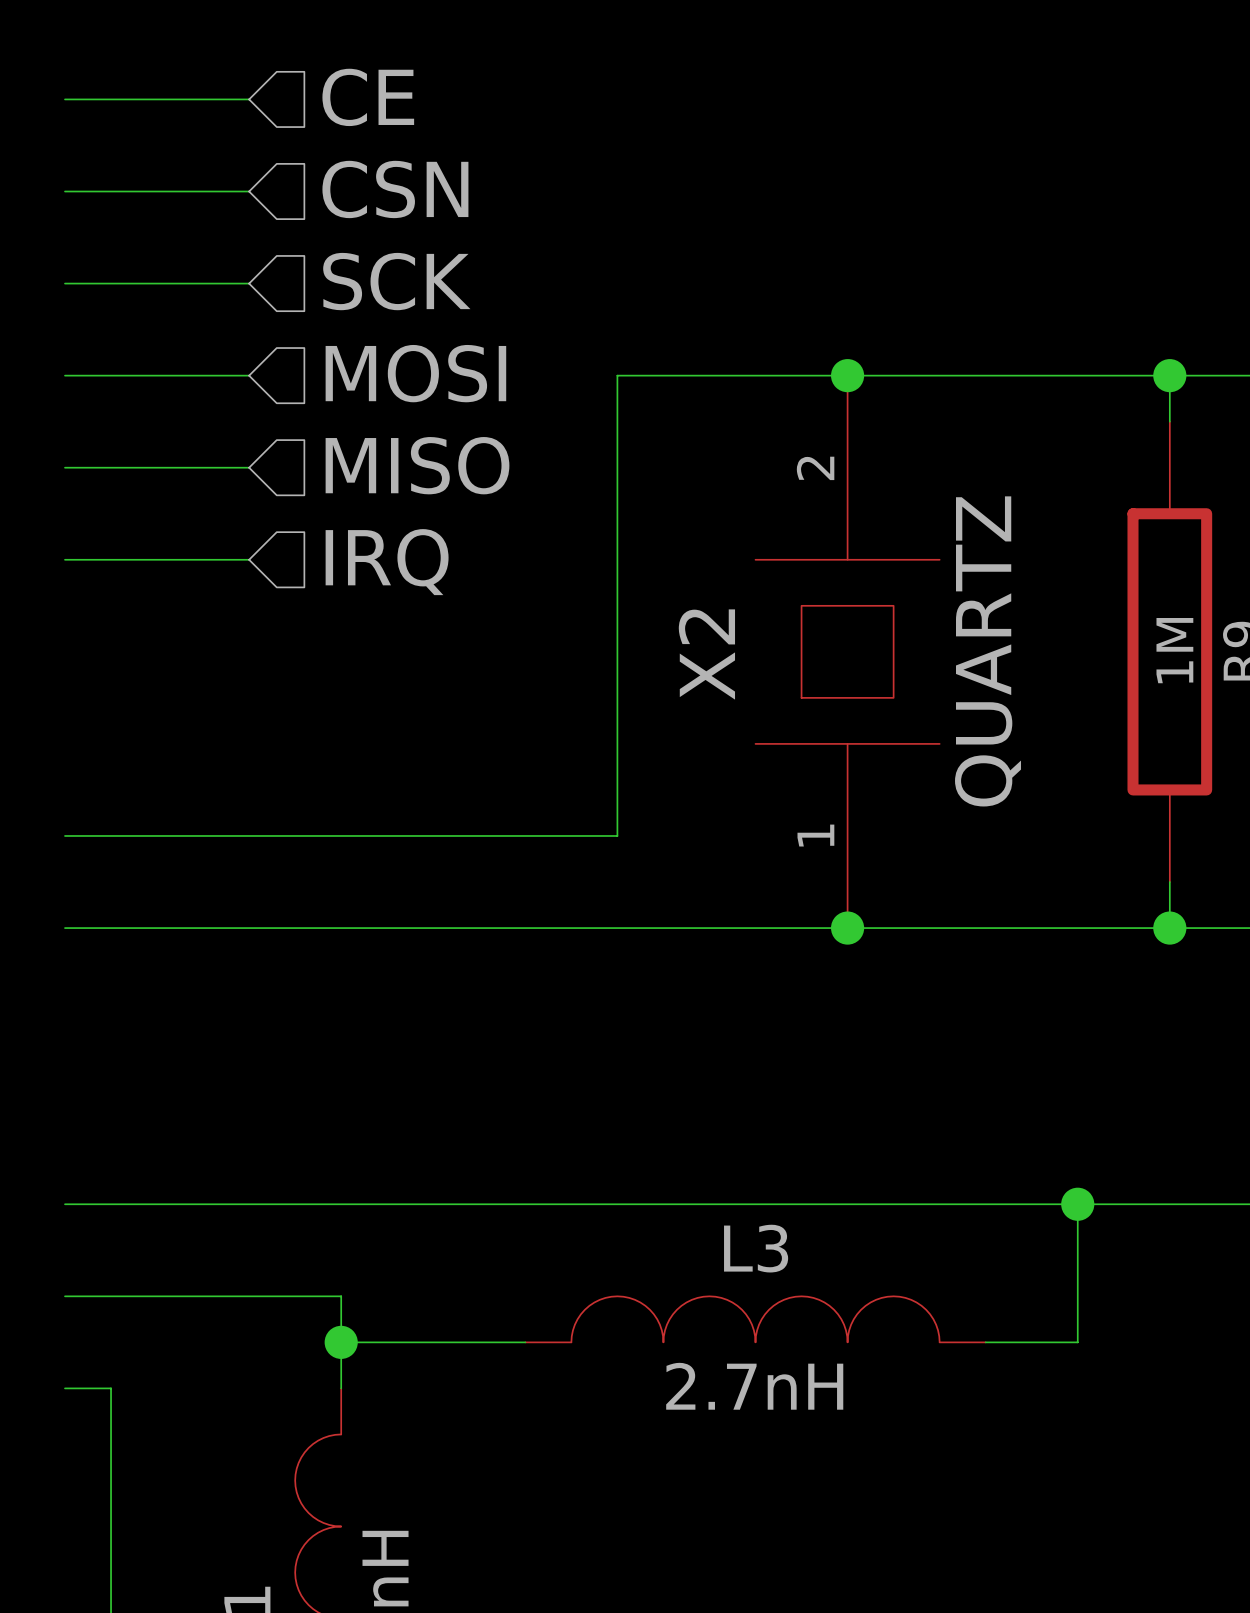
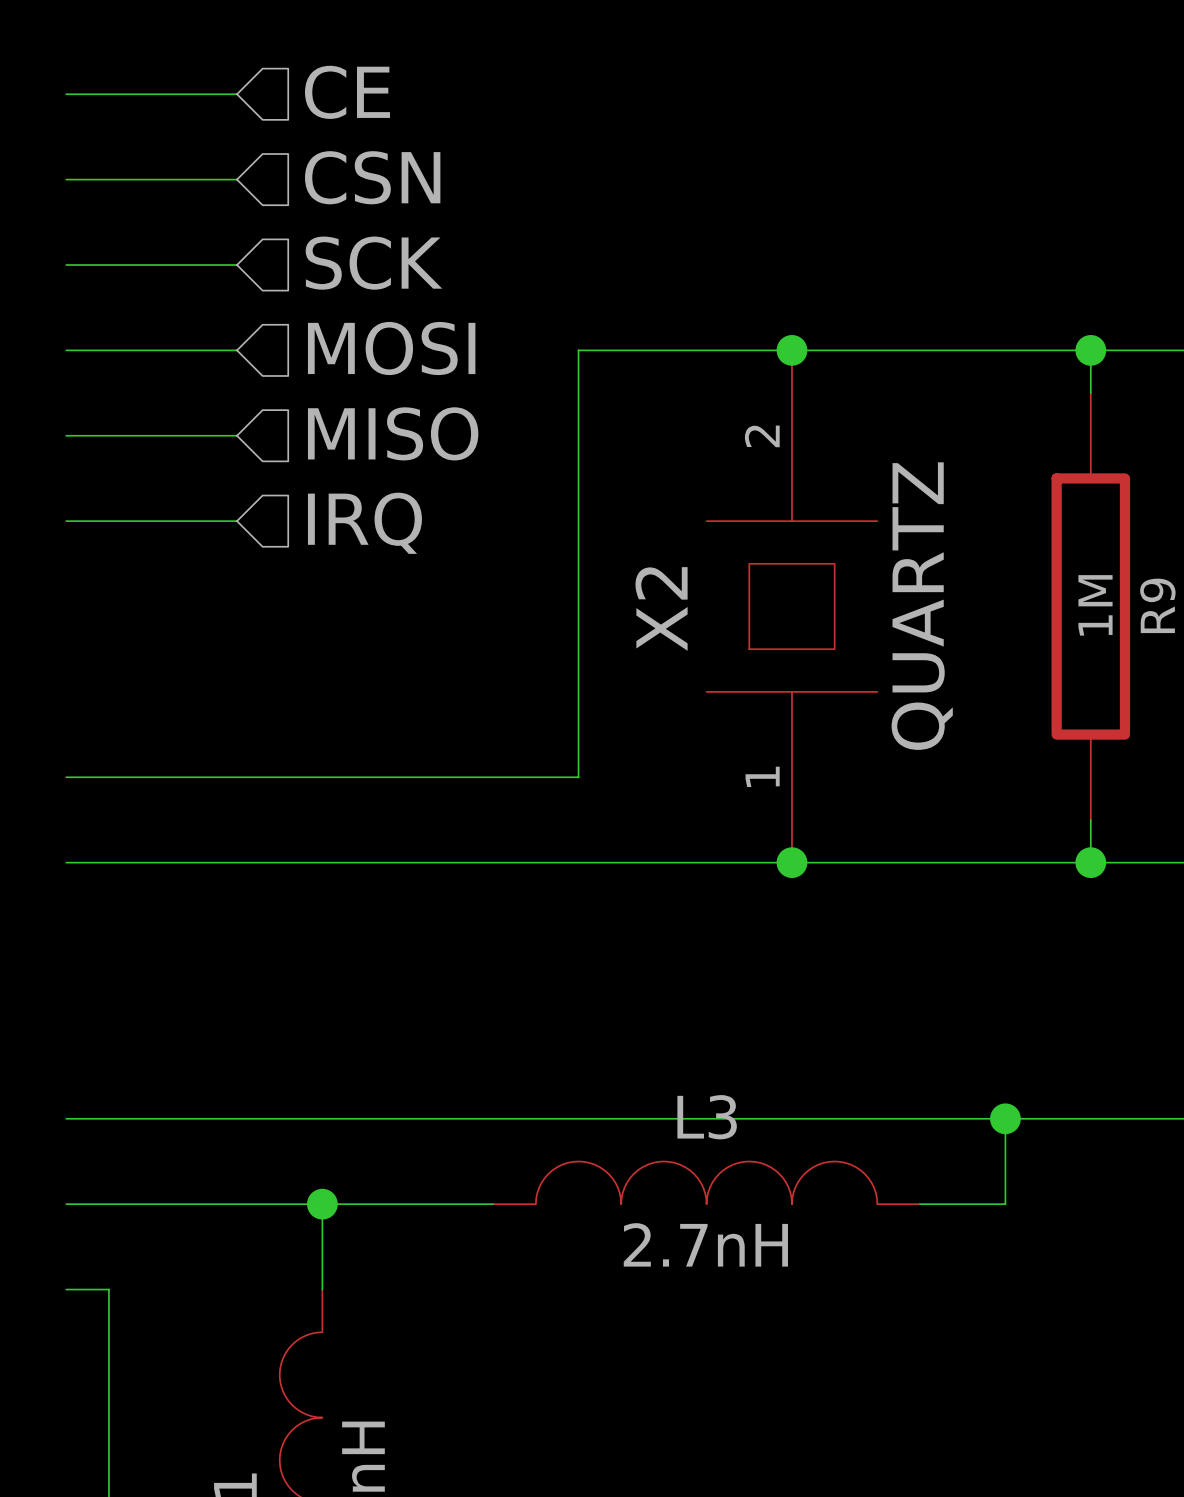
wire: (1077, 1296) (1077, 1342) (985, 1342) -> (1005, 1204) (920, 1204)
L3 position: (755, 1319) -> (706, 1182)
wire: (341, 1342) (525, 1342) -> (322, 1204) (493, 1204)
junction position: (341, 1342) -> (322, 1204)

